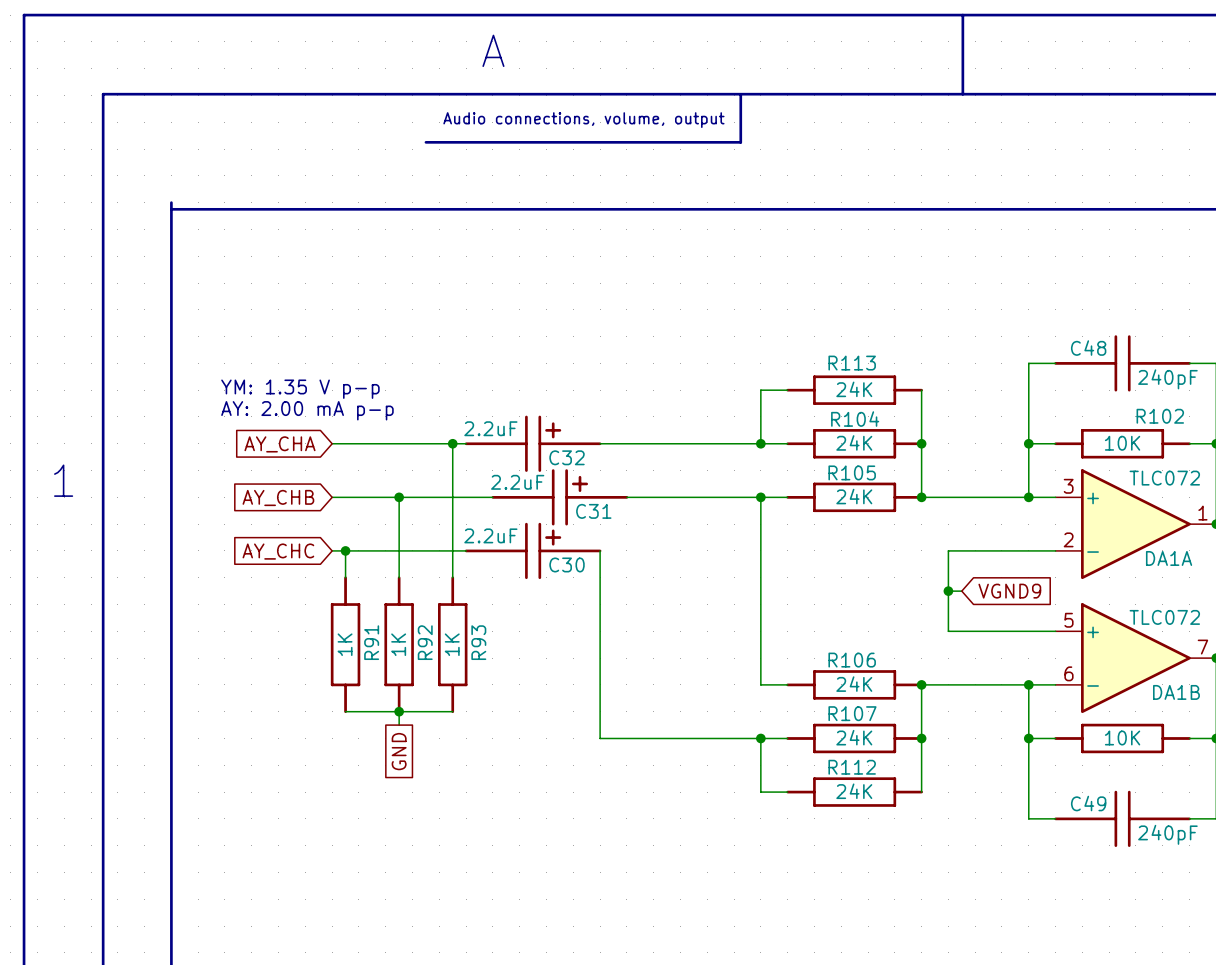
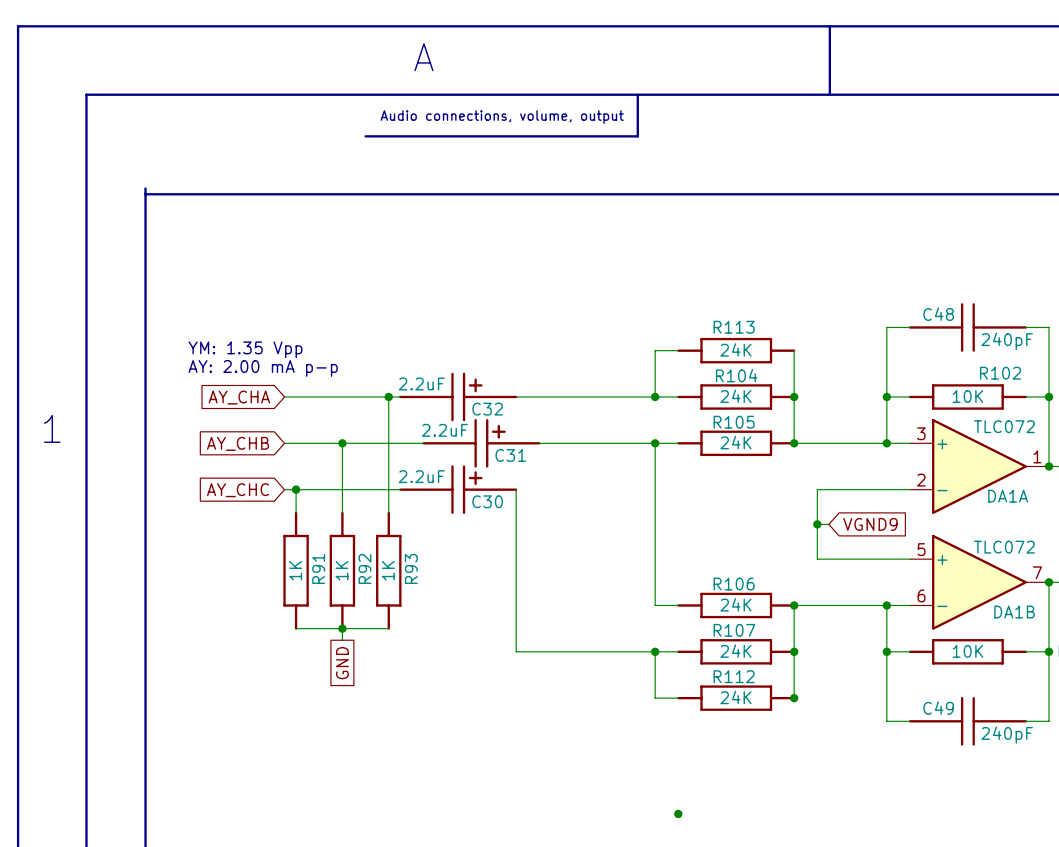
text: YM: 1.35 V p-p (300, 389) -> YM: 1.35 Vpp (245, 349)
junction: none -> (794, 698)
junction: none -> (678, 813)

